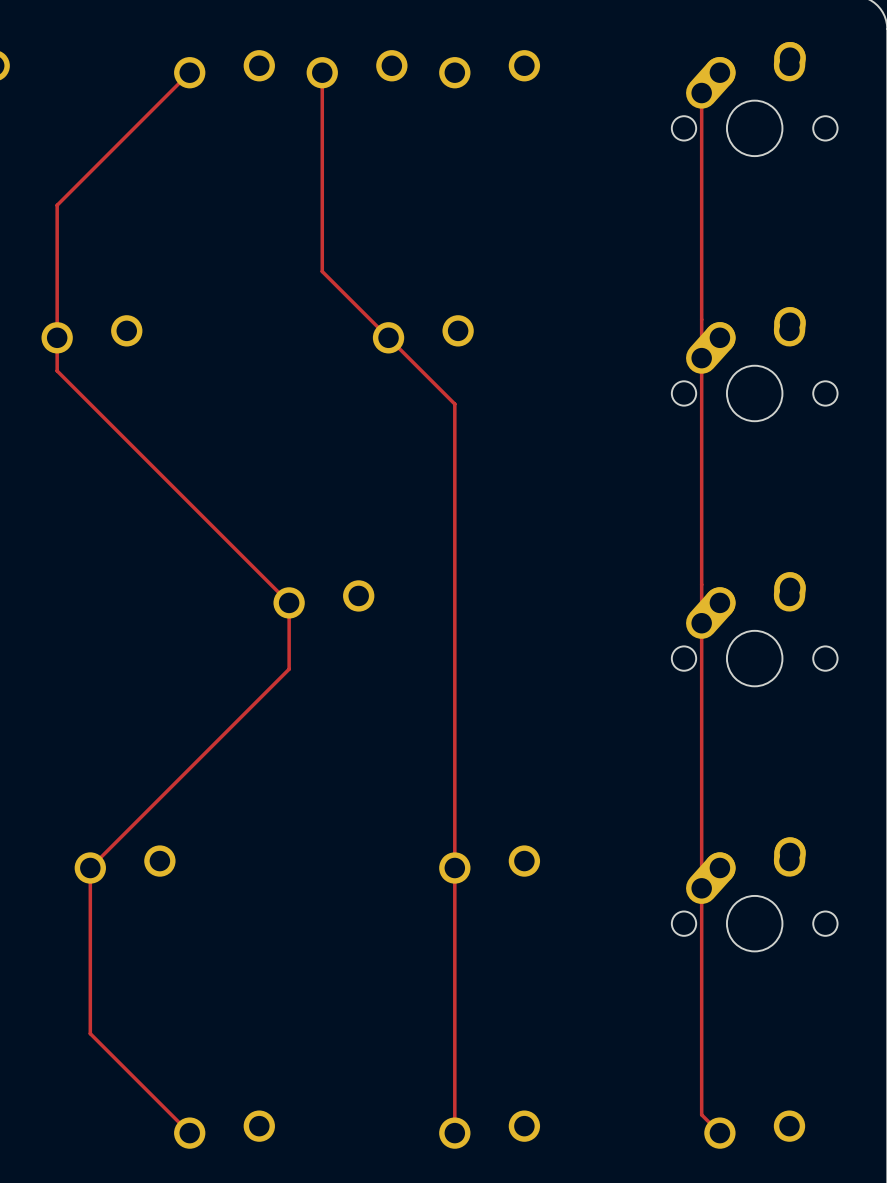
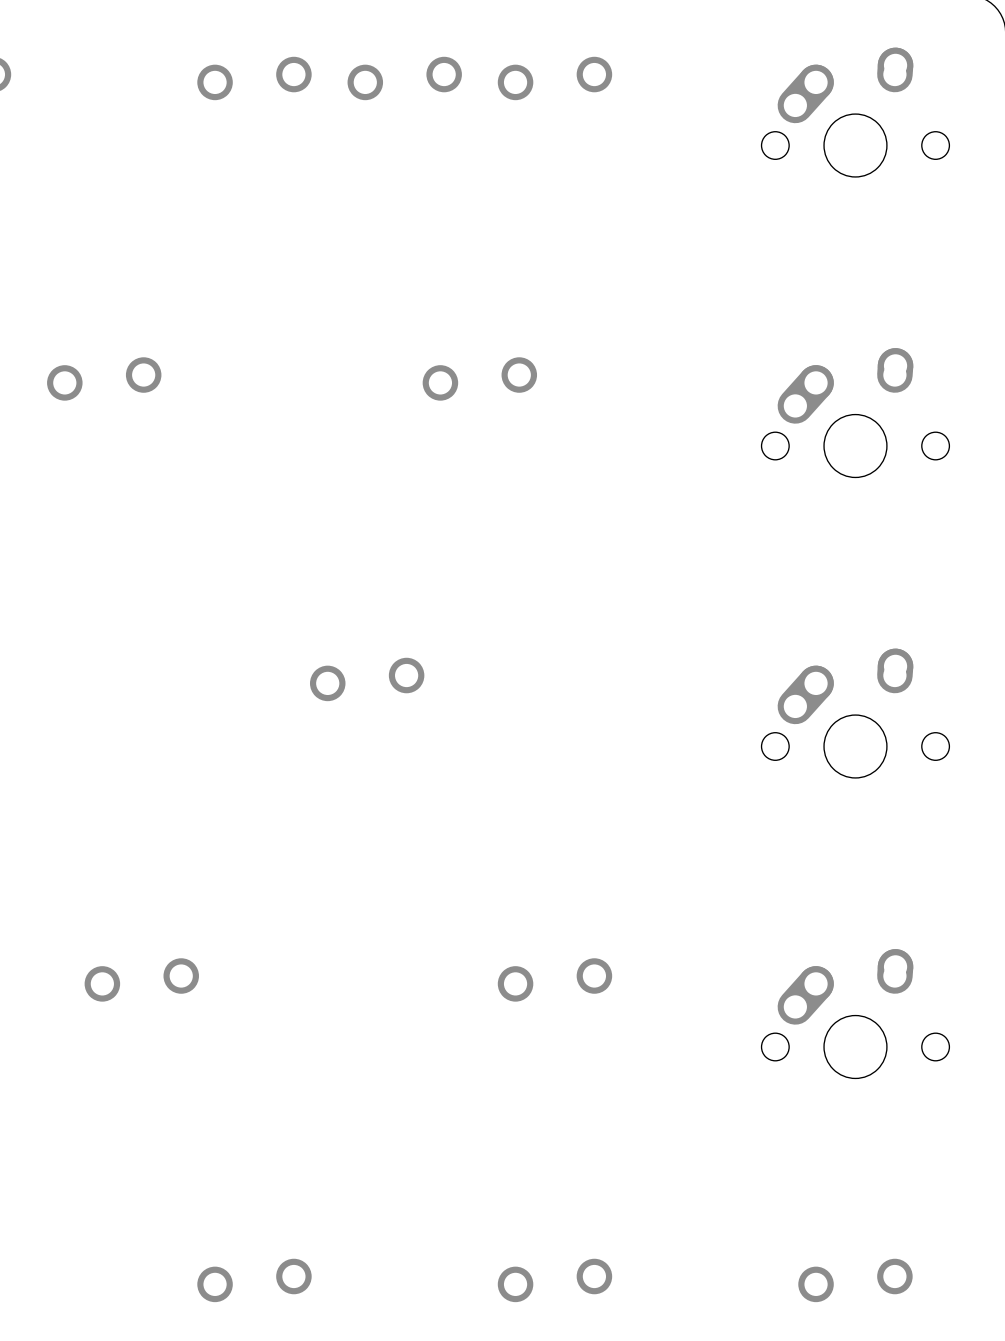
track: (189, 72) (57, 205) (57, 370) (289, 602) (289, 669) (90, 868) (90, 1033) (189, 1133) -> none
track: (322, 72) (322, 271) (454, 404) (454, 1133) -> none
track: (701, 93) (701, 1114) (719, 1133) -> none

